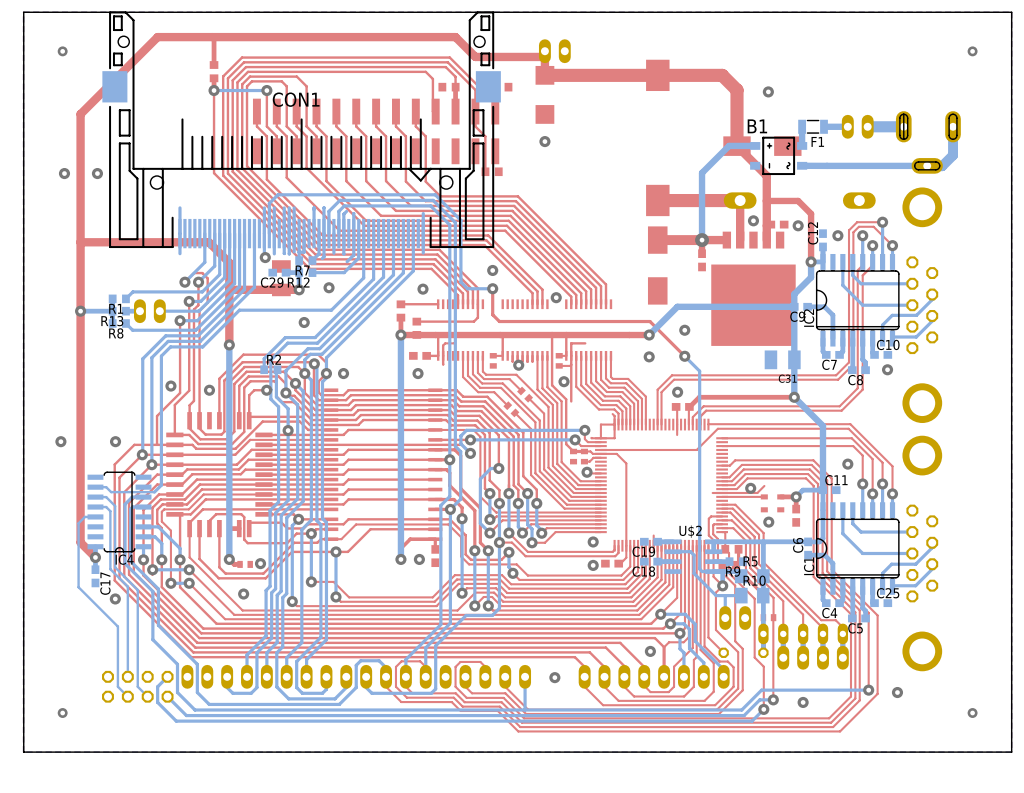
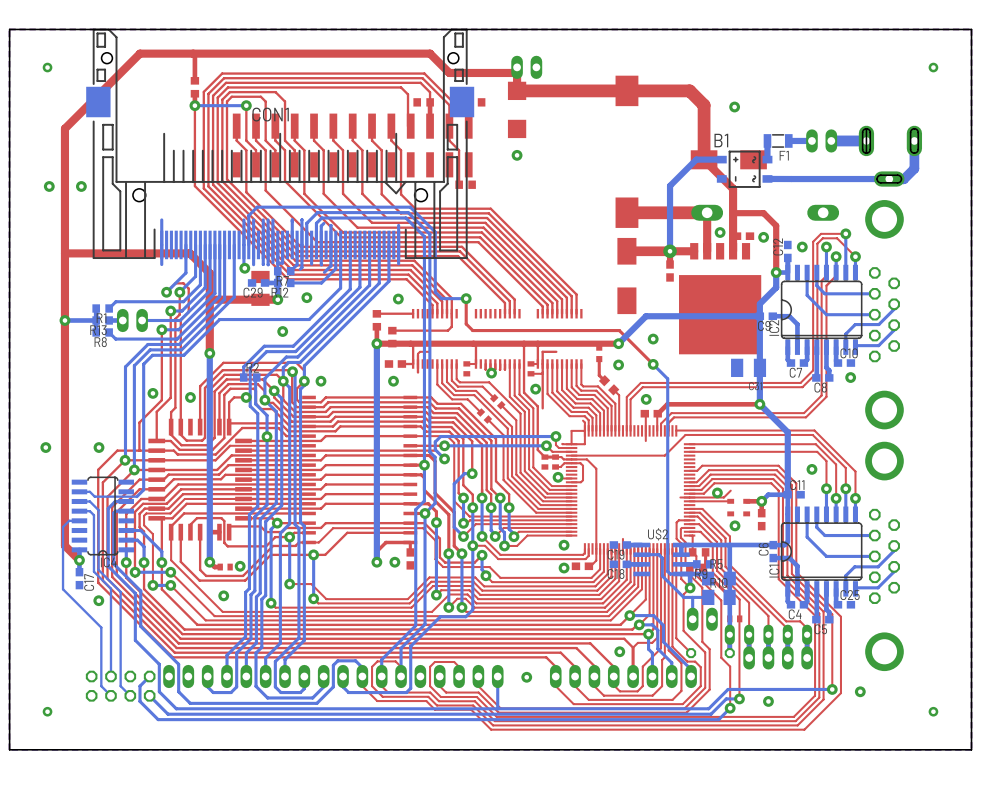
via: (492, 270) -> none
via: (556, 297) -> none
part: none -> (599, 353)
top track: none -> (599, 359) (599, 375) (604, 380)
part: none -> (609, 385)
top track: none -> (613, 389) (619, 395) (619, 430)
top track: none -> (571, 463) (580, 463) (583, 465) (583, 480) (580, 482) (571, 482)

